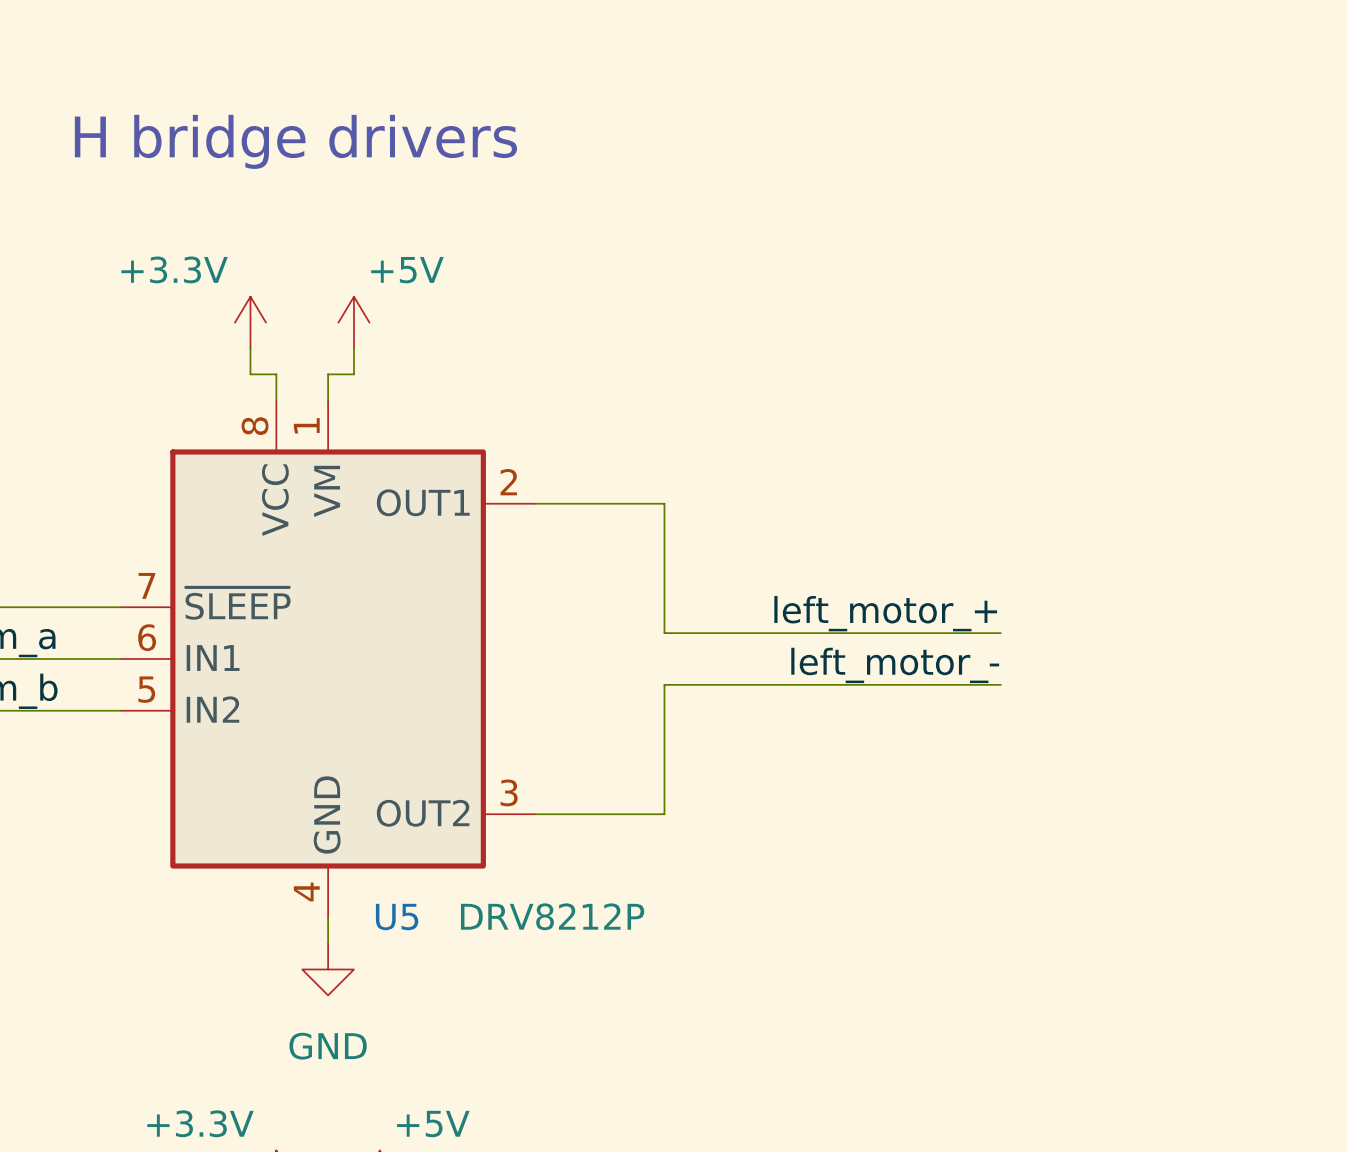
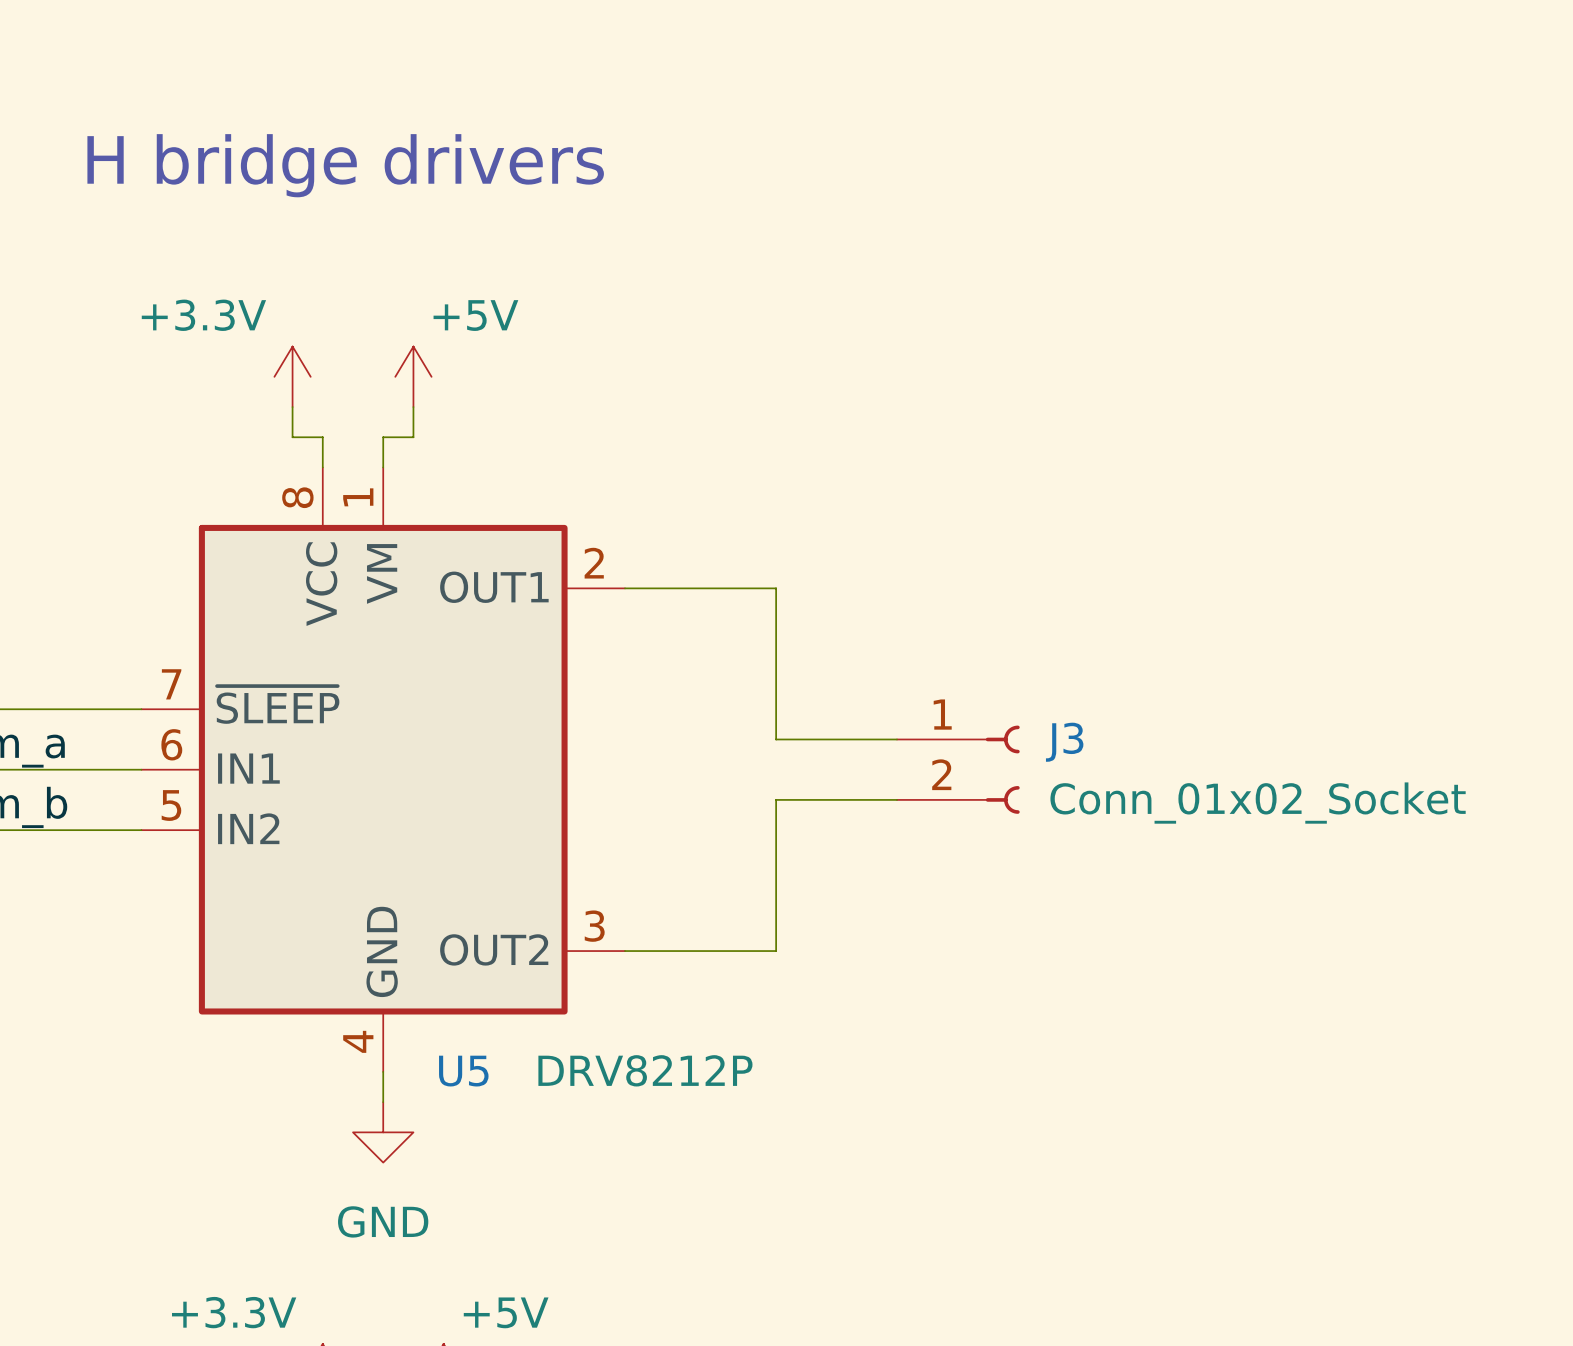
label: left_motor_+ (885, 613) -> none
wire: (767, 633) (1000, 633) -> none
J3: none -> Conn_01x02_Socket (958, 769)
label: left_motor_- (895, 665) -> none
wire: (767, 684) (1000, 684) -> none

